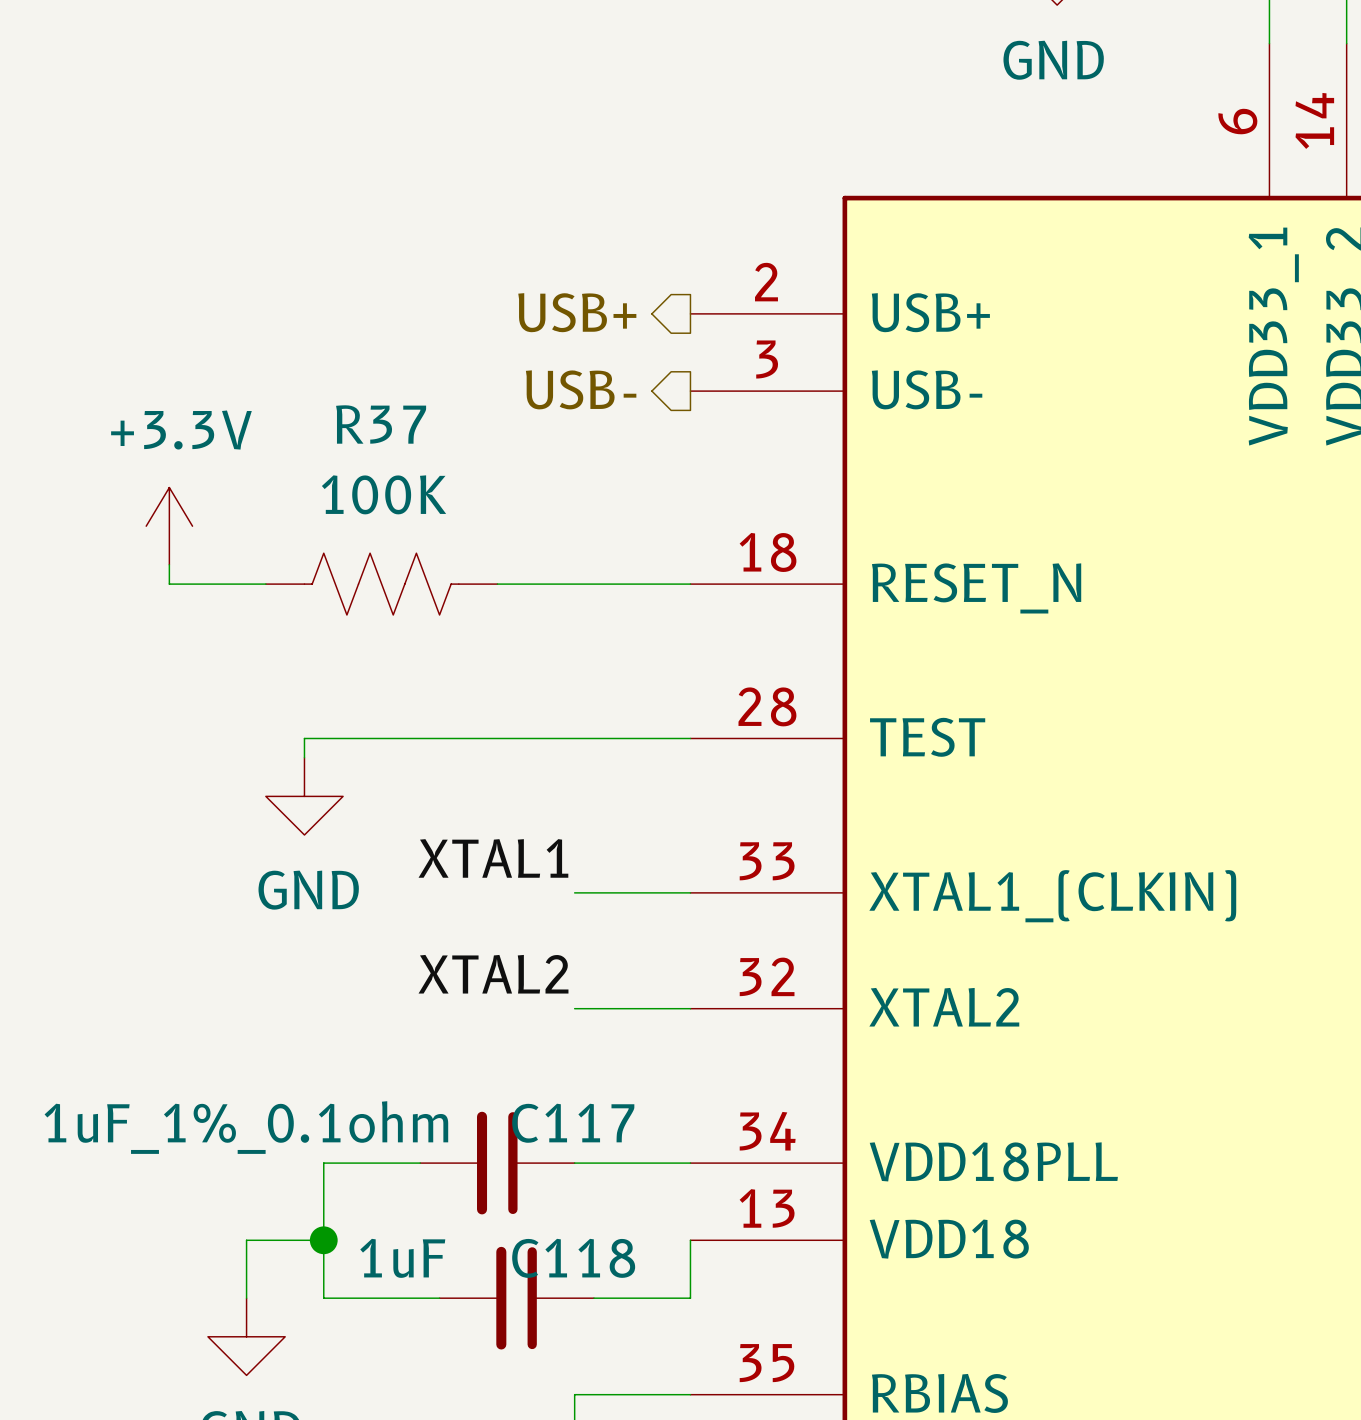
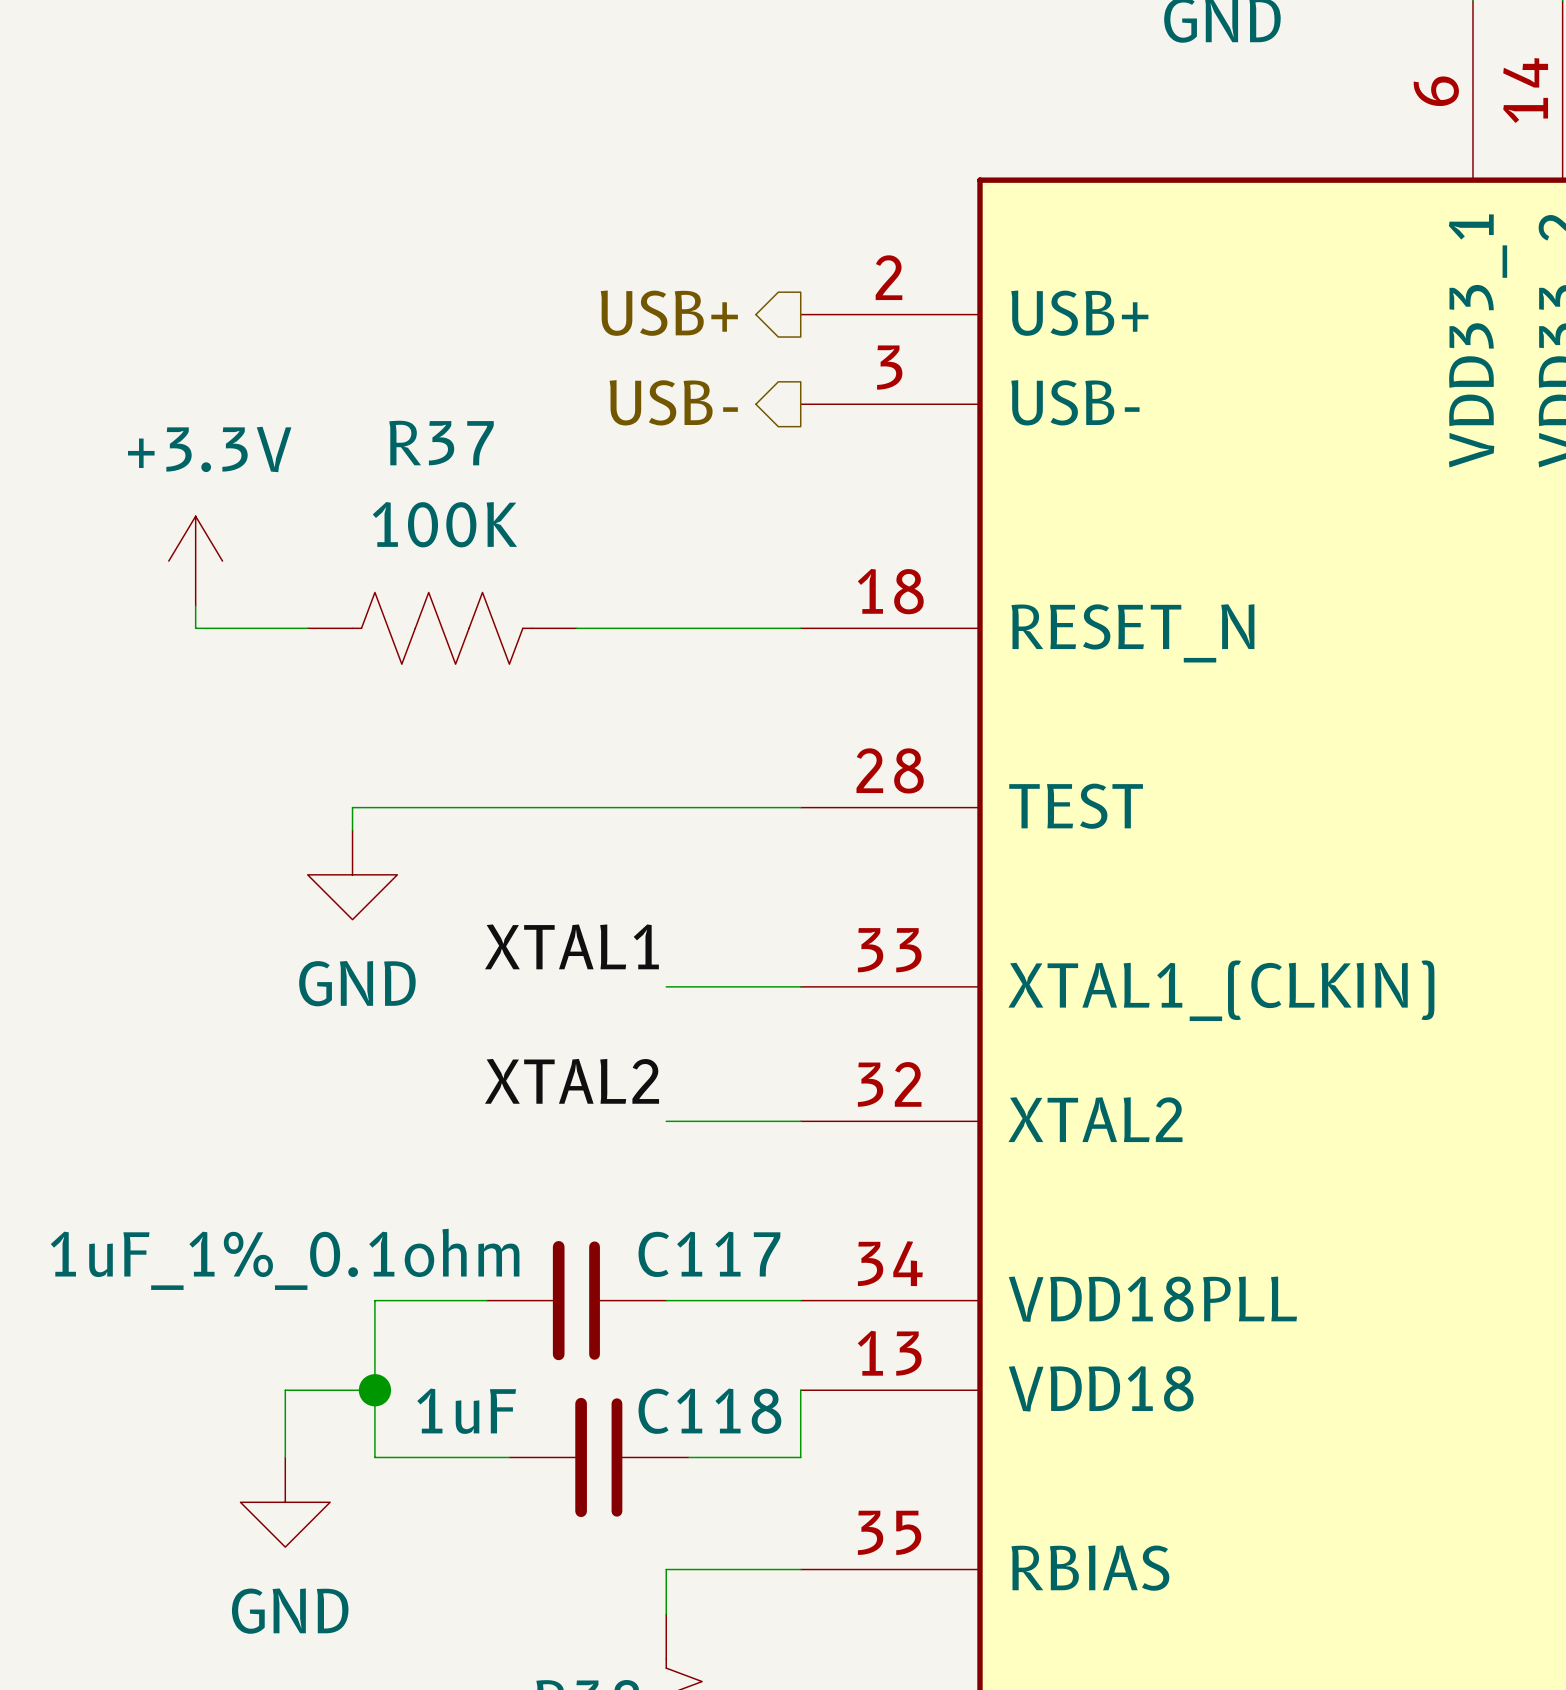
C117 name position: C117 (573, 1123) -> C117 (709, 1254)
C118 name position: C118 (573, 1258) -> C118 (709, 1411)

